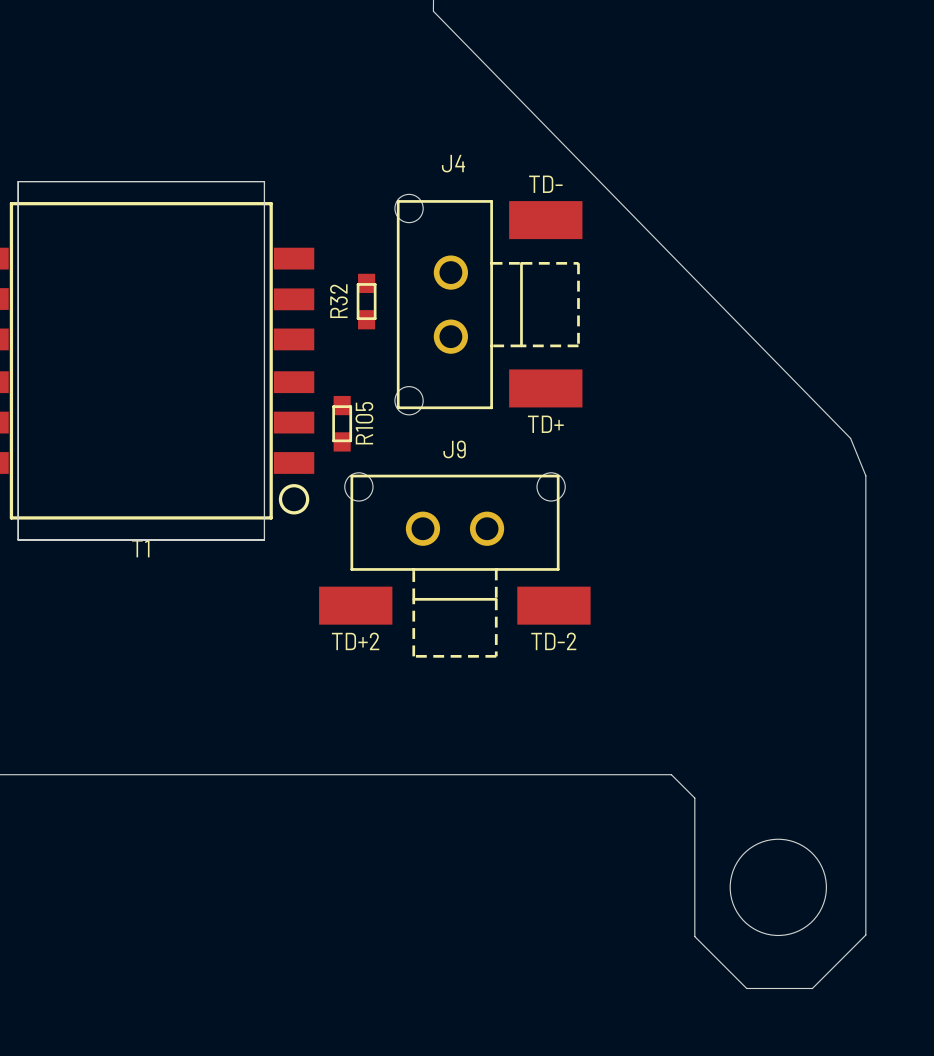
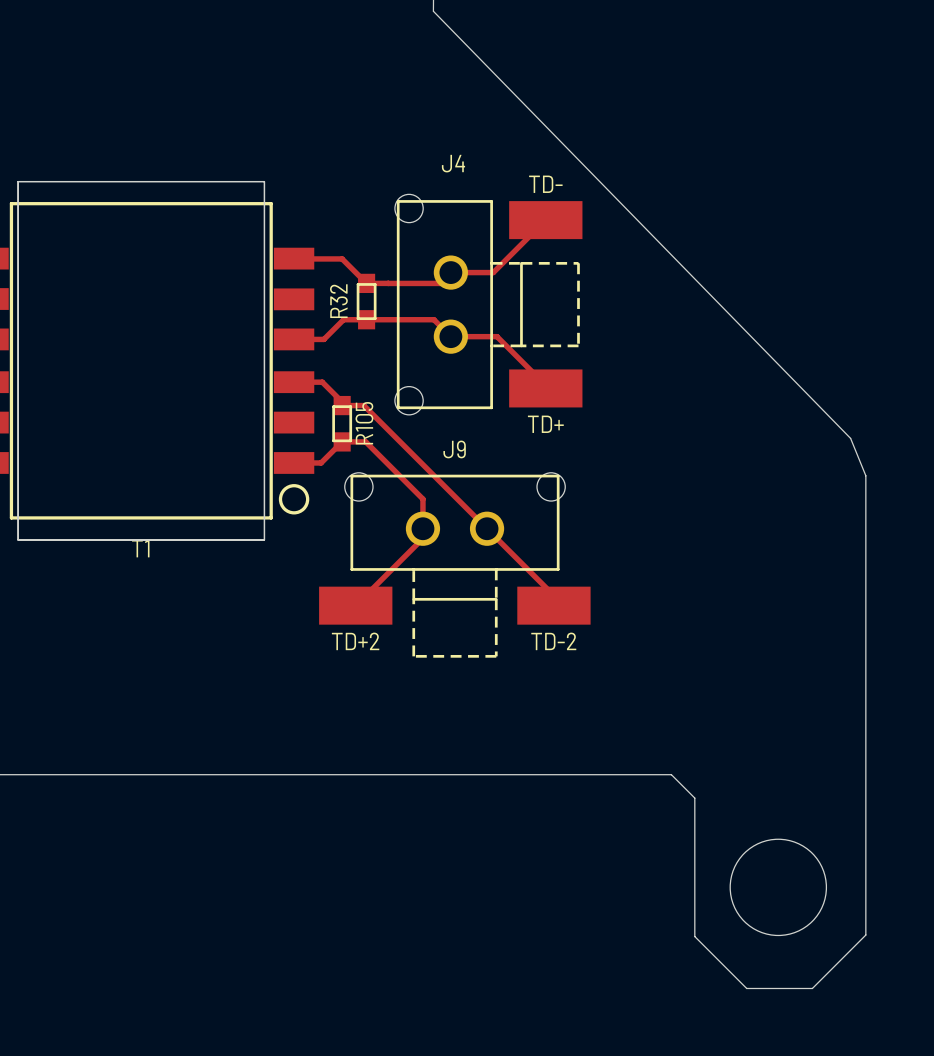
top track: none -> (545, 220) (493, 272) (450, 272) (440, 283) (366, 283) (342, 258) (288, 258) (294, 258)
top track: none -> (294, 339) (323, 339) (343, 319) (433, 319) (450, 336) (497, 336) (548, 388) (545, 388)
top track: none -> (294, 382) (322, 382) (342, 402) (342, 405) (363, 405) (553, 595) (553, 605)
top track: none -> (294, 462) (321, 462) (342, 441) (365, 441) (422, 499) (422, 538) (355, 605)

